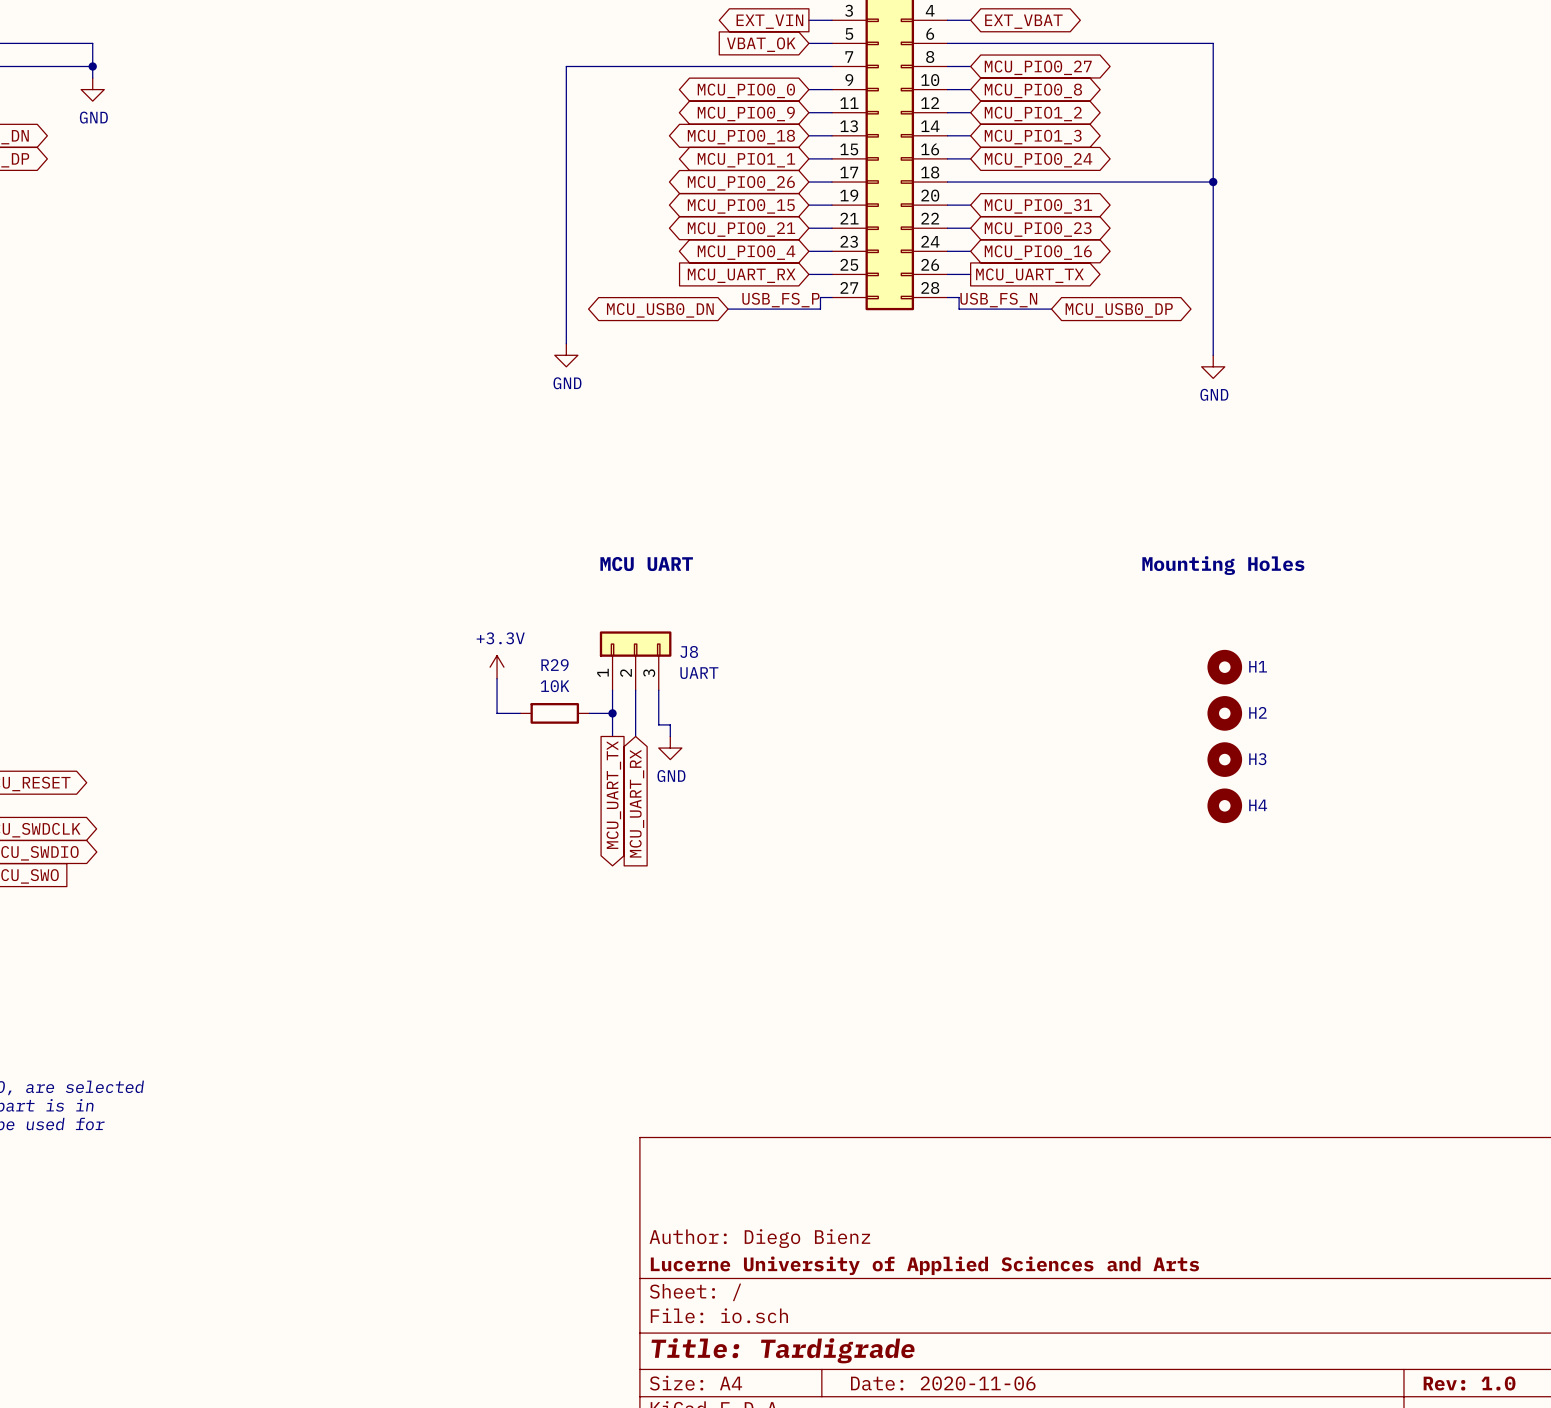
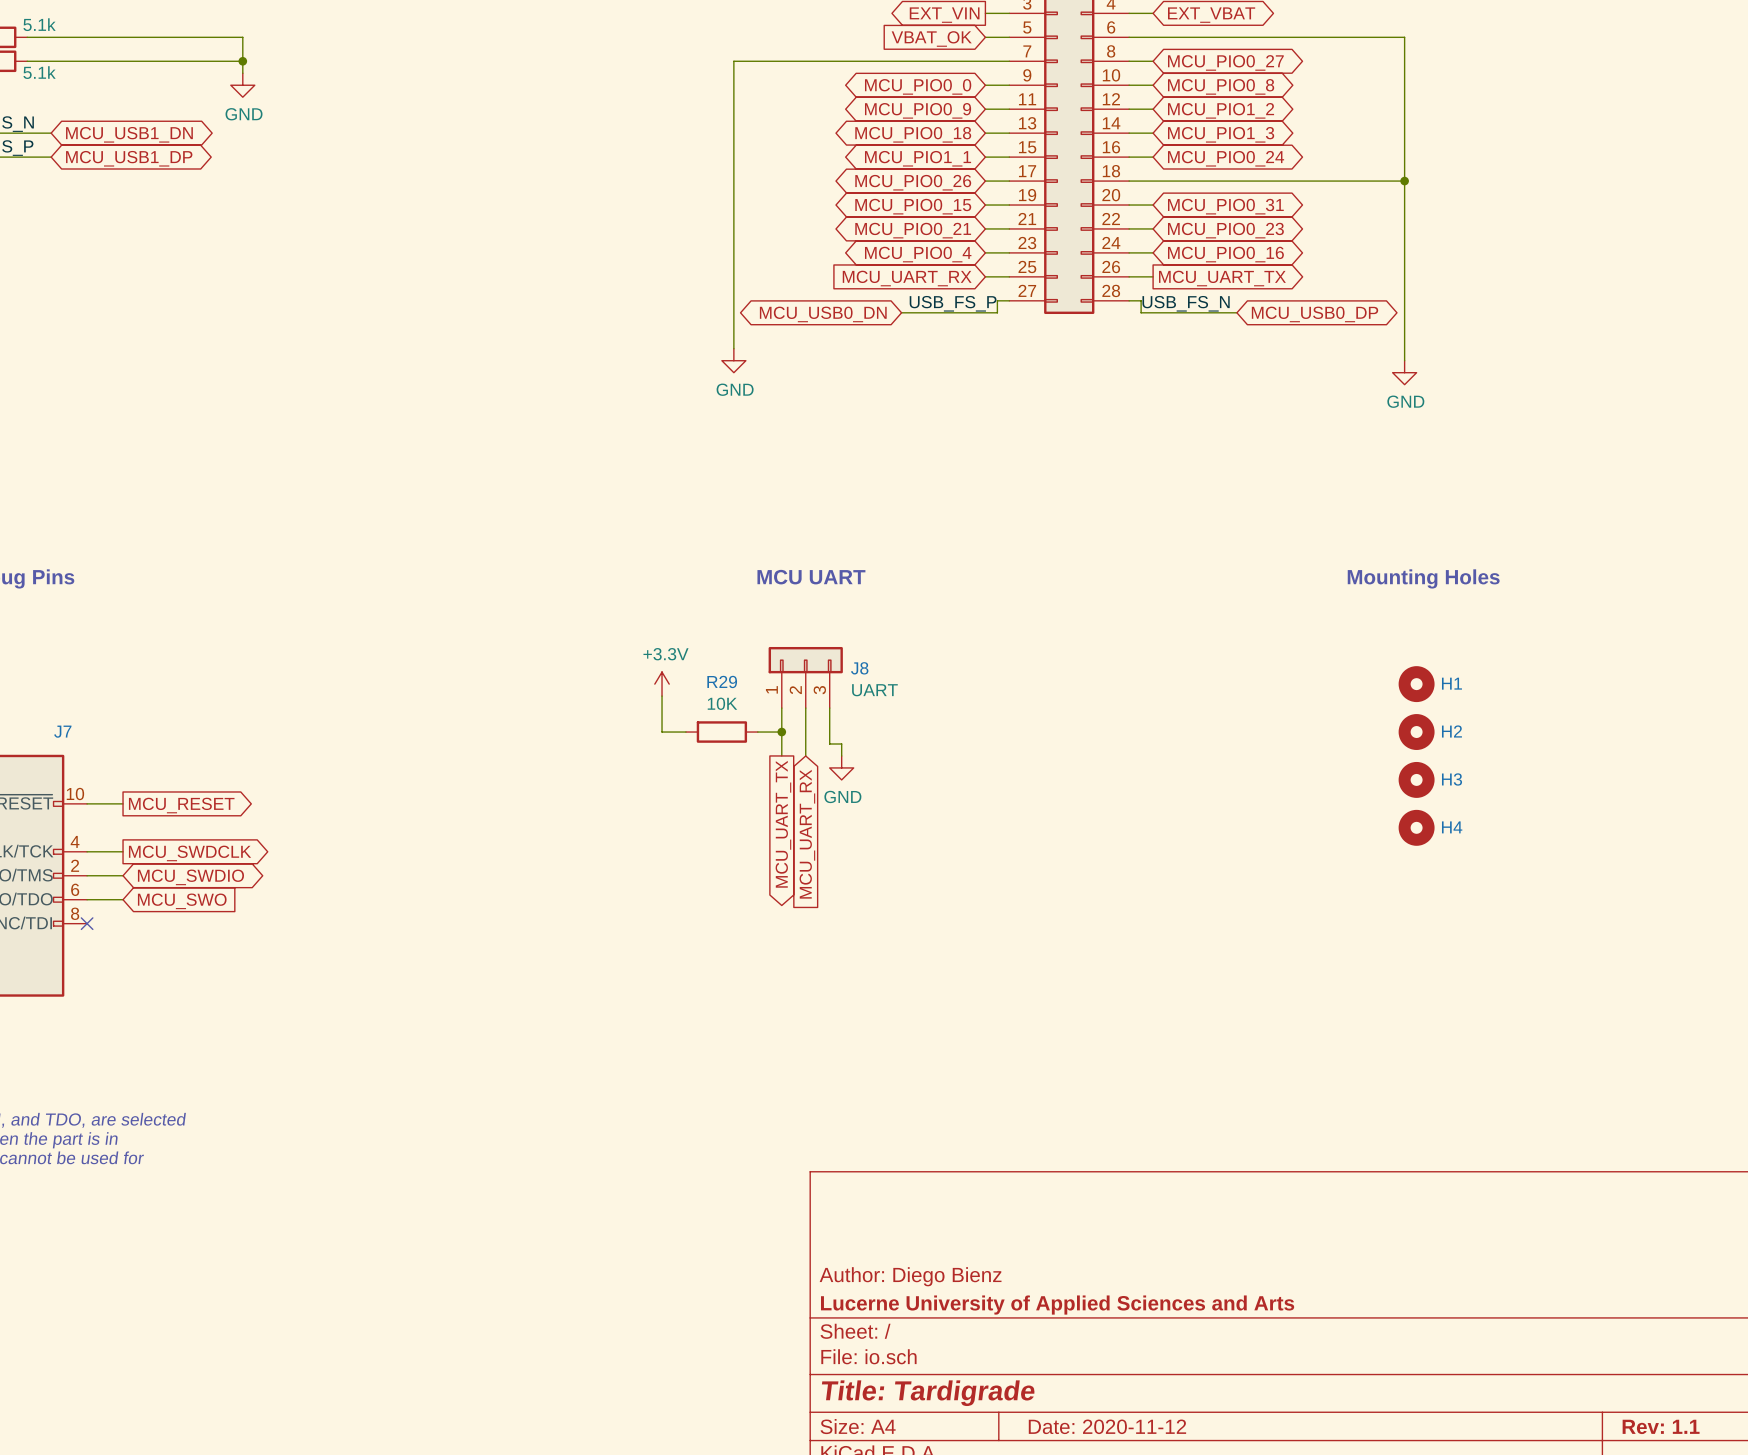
title block: Date: 2020-11-06 (943, 1383) -> Date: 2020-11-12 (1107, 1426)
title block: Rev: 1.0 (1469, 1383) -> Rev: 1.1 (1661, 1426)

